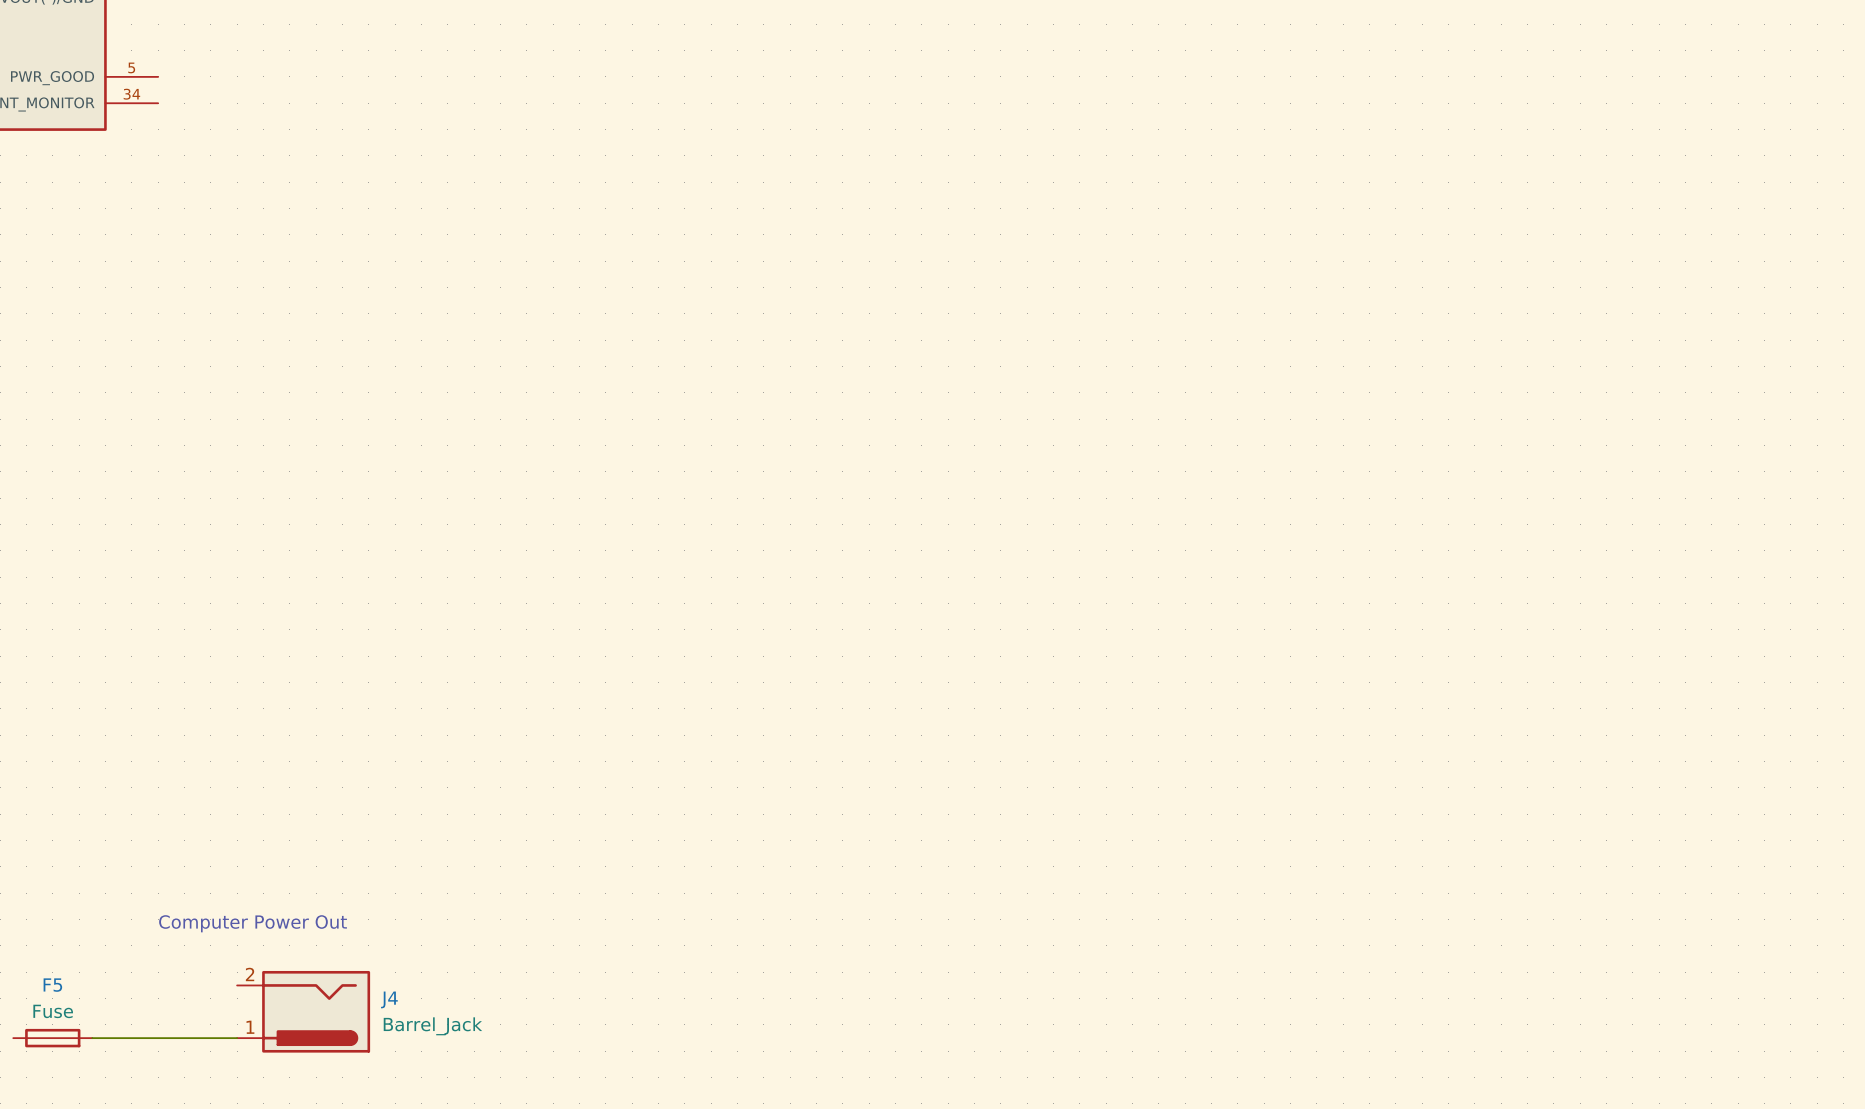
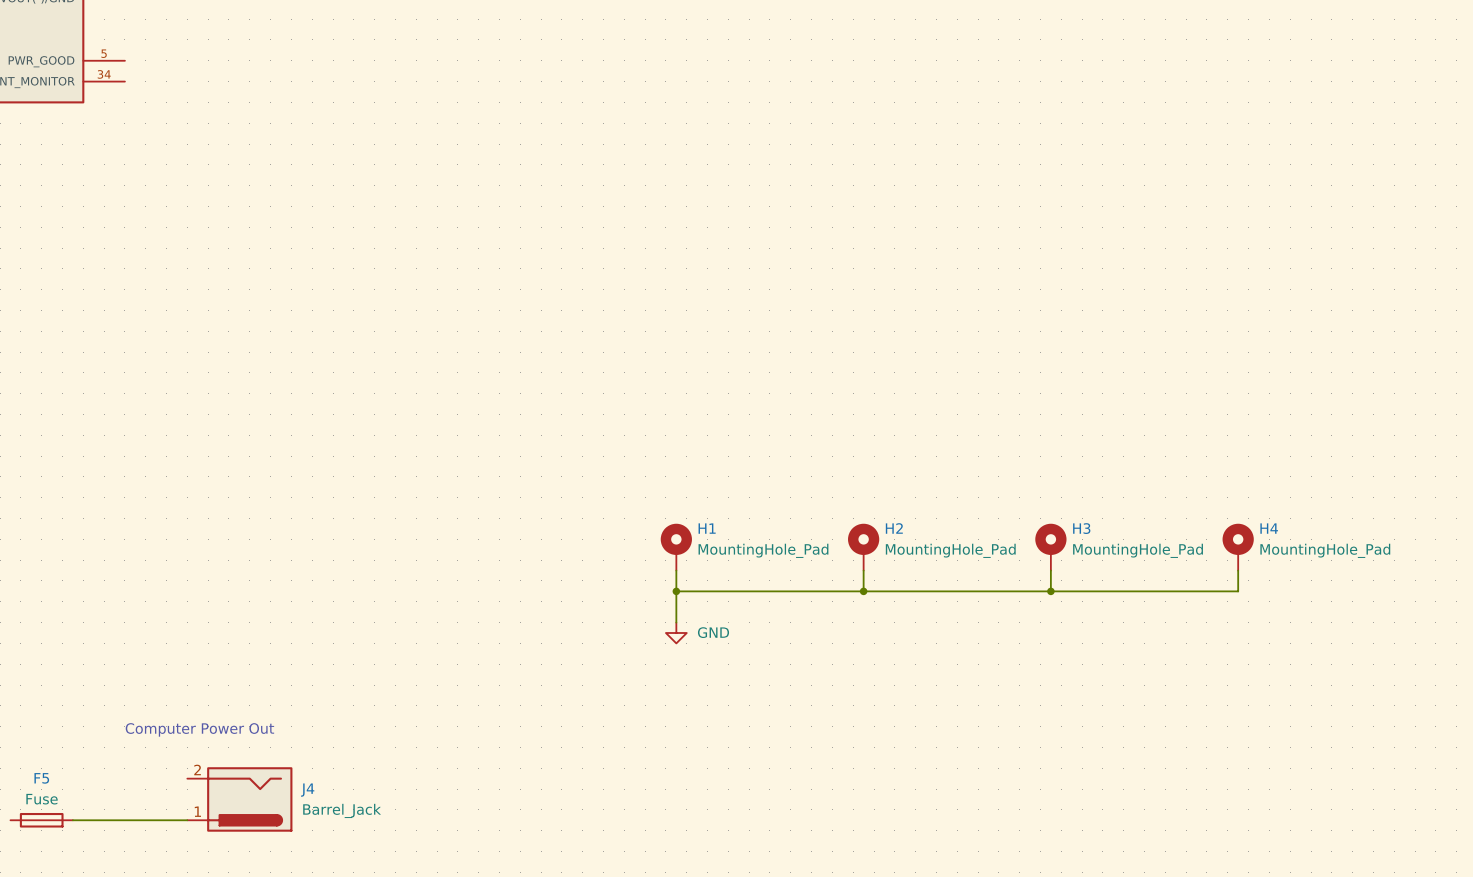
H1: none -> MountingHole_Pad (676, 547)
H2: none -> MountingHole_Pad (863, 547)
H3: none -> MountingHole_Pad (1050, 547)
H4: none -> MountingHole_Pad (1238, 547)
wire: none -> (676, 570) (676, 622)
wire: none -> (863, 570) (863, 591)
wire: none -> (1050, 570) (1050, 591)
wire: none -> (1238, 570) (1238, 591) (676, 591)
junction: none -> (676, 591)
junction: none -> (863, 591)
junction: none -> (1050, 591)
power symbol: none -> GND (676, 632)

